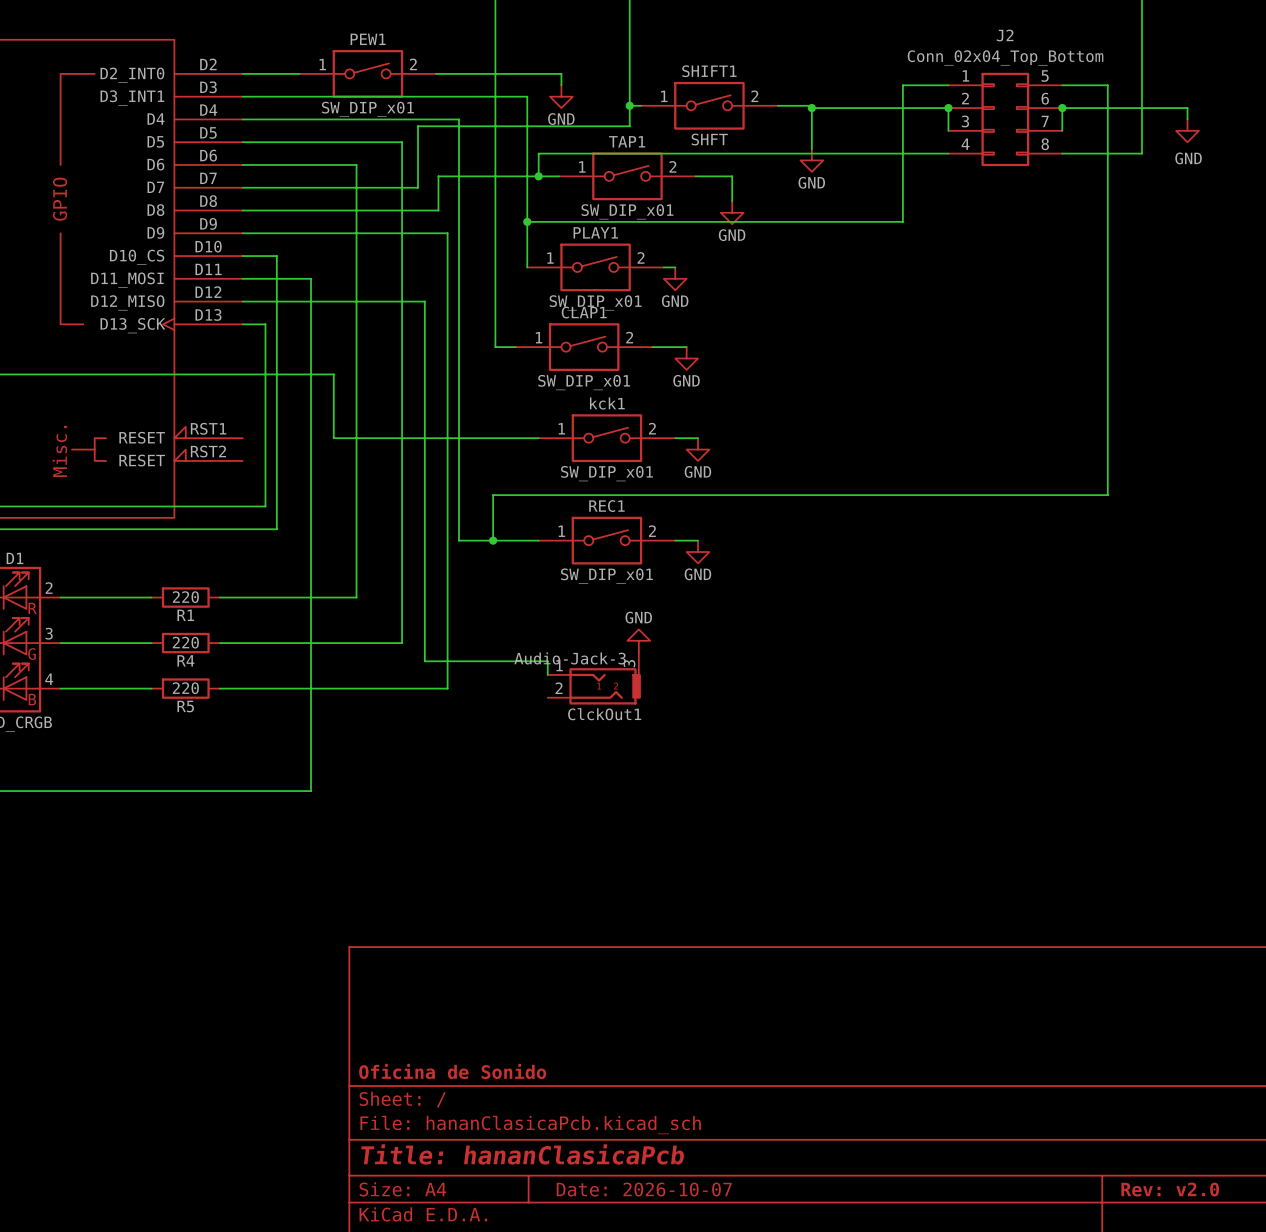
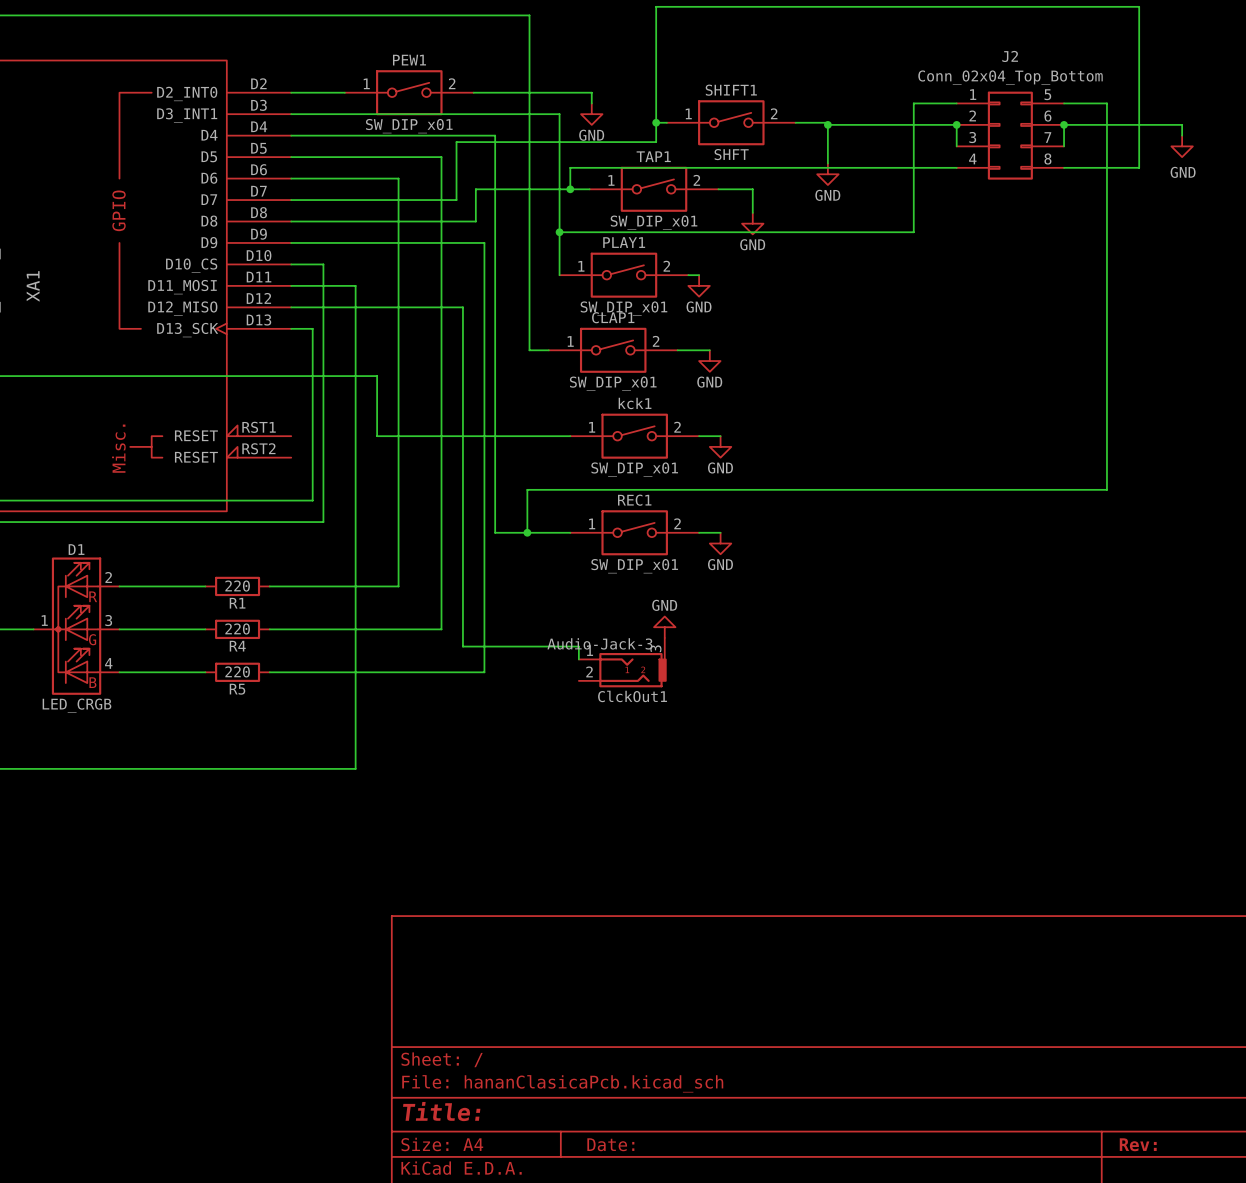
title block: Oficina de Sonido (452, 1071) -> none
title block: Title: hananClasicaPcb (522, 1154) -> Title: (441, 1111)
title block: Date: 2026-10-07 (644, 1189) -> Date: (610, 1144)
title block: Rev: v2.0 (1170, 1189) -> Rev: (1138, 1144)

